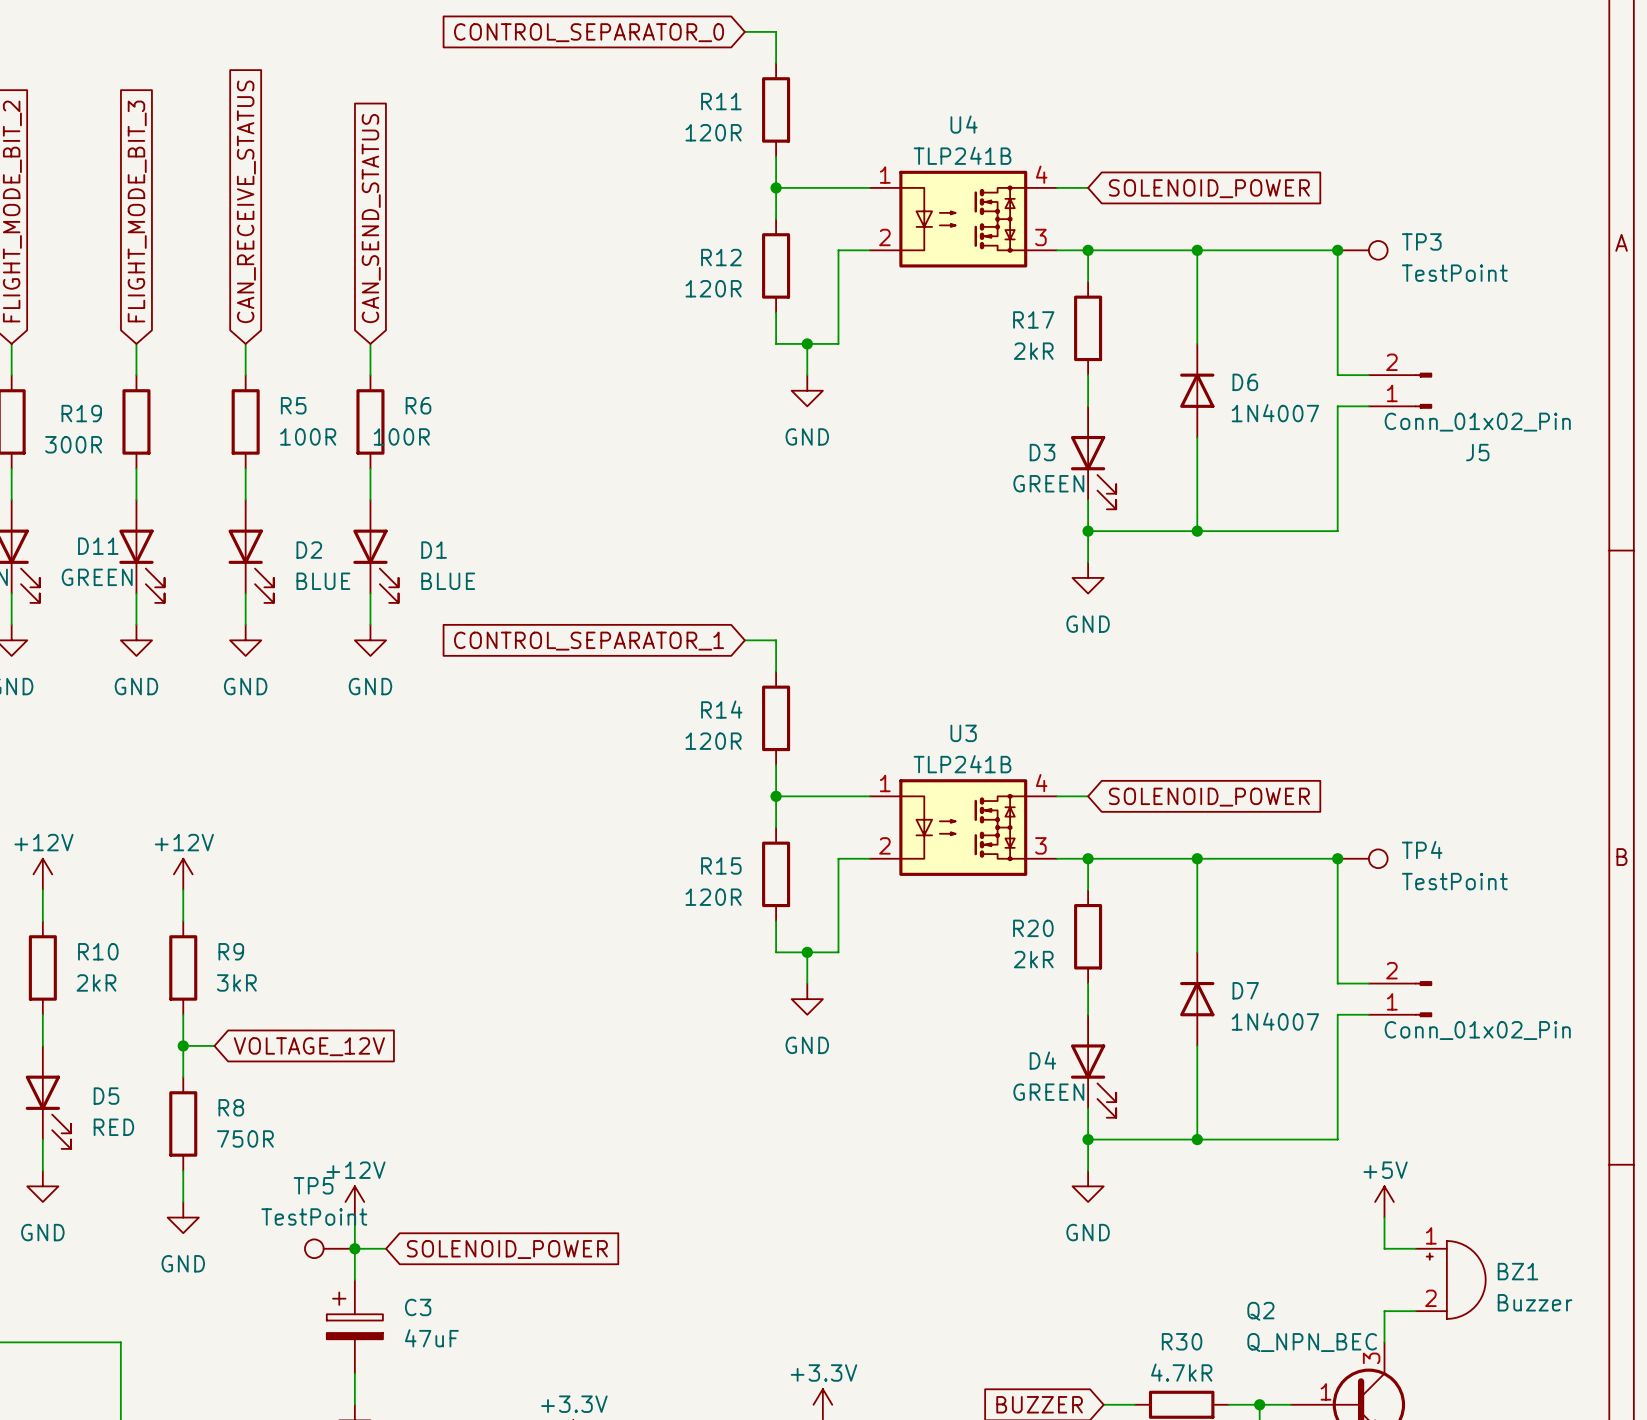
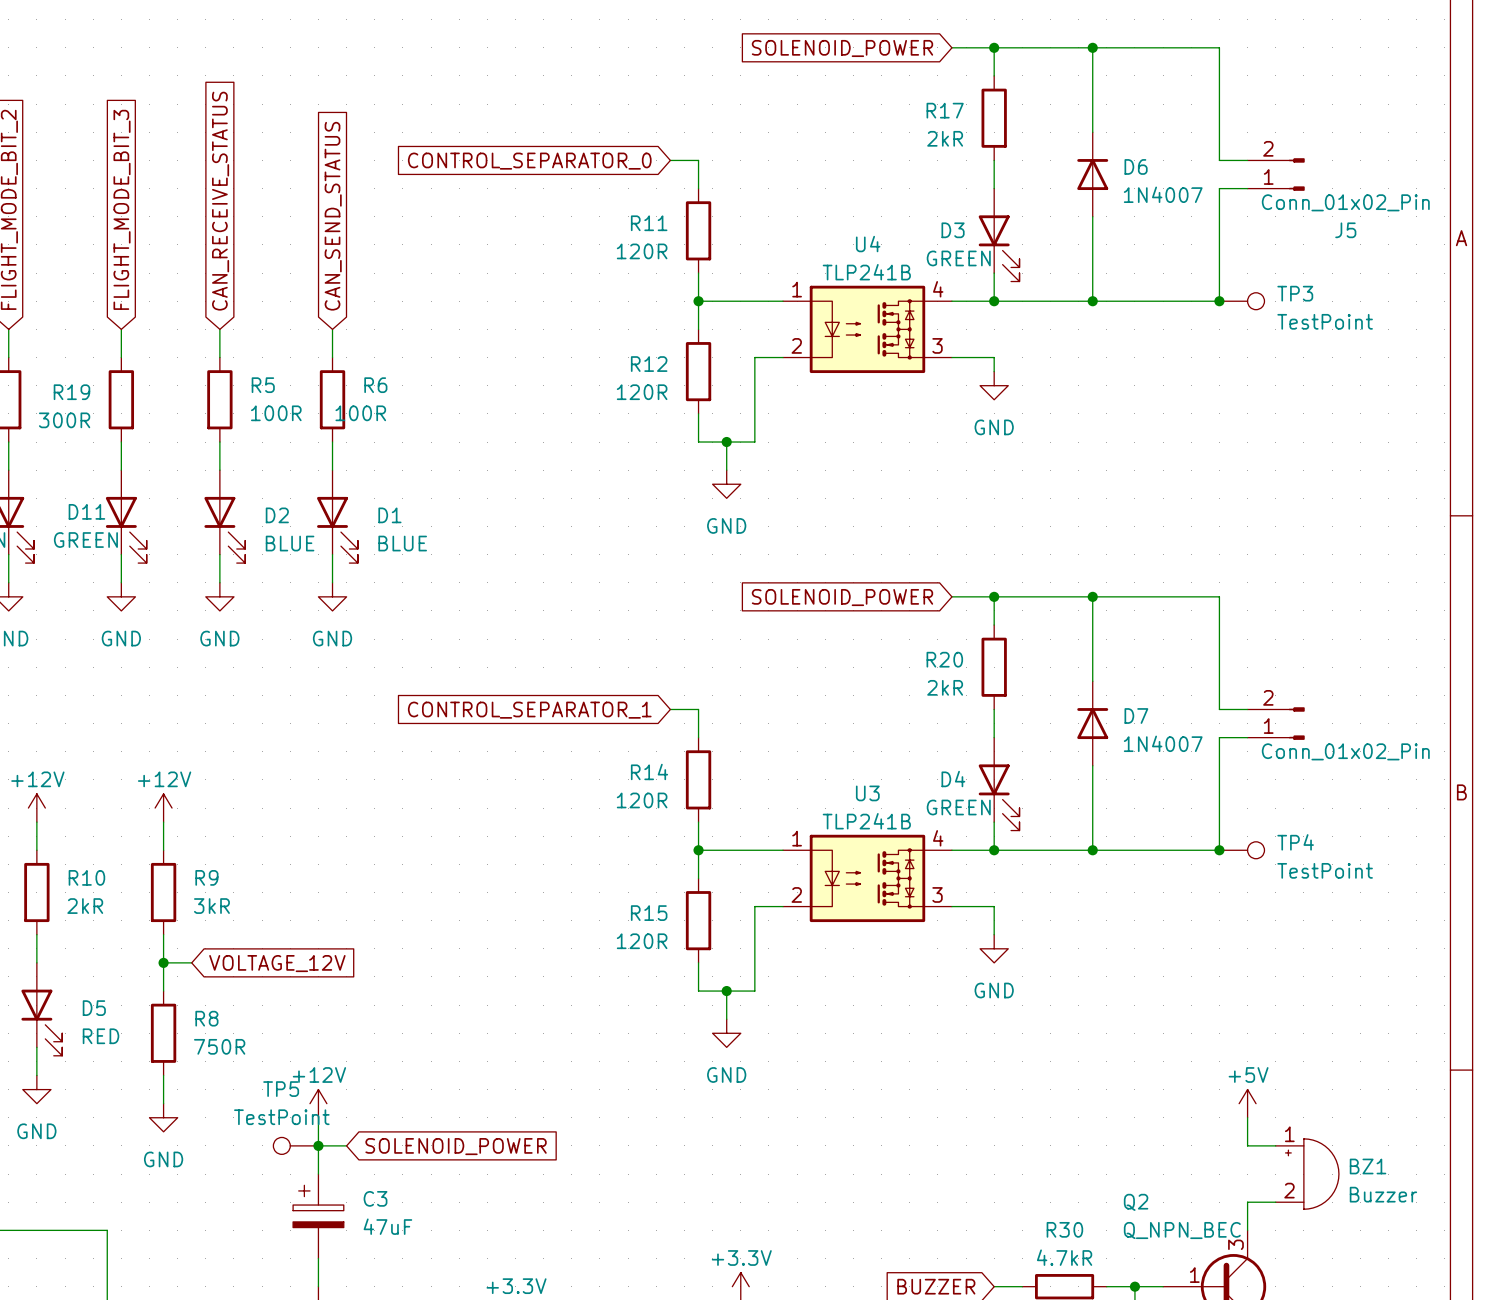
wire: (744, 31) (776, 31) (776, 63) -> none
wire: none -> (951, 47) (1219, 47) (1219, 160) (1247, 160)
junction: none -> (994, 47)
junction: none -> (1092, 47)
global label position: CONTROL_SEPARATOR_0 (589, 32) -> CONTROL_SEPARATOR_0 (529, 161)
R11 position: (776, 109) -> (698, 230)
wire: none -> (670, 160) (698, 160)
junction: (776, 187) -> none
wire: (869, 187) (776, 187) (776, 219) -> none
wire: (1056, 187) (1088, 187) -> none
wire: none -> (1247, 188) (1219, 188) (1219, 301) (951, 301)
global label rotation: 0° (1209, 188) -> 180° (842, 48)
global label position: SOLENOID_POWER (1209, 188) -> SOLENOID_POWER (842, 48)
U4 position: (963, 219) -> (867, 329)
wire: (869, 250) (838, 250) (838, 343) (776, 343) -> none
wire: (1056, 250) (1337, 250) (1337, 375) (1368, 375) -> none
wire: (1088, 250) (1088, 281) -> (994, 47) (994, 75)
junction: (1088, 250) -> none
wire: (1197, 250) (1197, 343) -> (1092, 47) (1092, 132)
junction: (1197, 250) -> none
junction position: (1337, 250) -> (1219, 301)
TP3 position: (1362, 250) -> (1241, 301)
R12 position: (776, 265) -> (698, 371)
wire: none -> (698, 273) (698, 301) (783, 301)
wire: none -> (994, 273) (994, 301)
junction: none -> (994, 301)
junction: none -> (1092, 301)
R17 position: (1088, 328) -> (994, 118)
wire: (807, 343) (807, 375) -> (726, 442) (726, 470)
junction position: (807, 343) -> (698, 301)
wire: none -> (783, 357) (754, 357) (754, 442) (698, 442) (698, 413)
wire: none -> (951, 357) (994, 357) (994, 371)
wire: (1088, 375) (1088, 406) -> (994, 160) (994, 188)
power symbol position: GND (807, 390) -> GND (726, 484)
D6 position: (1197, 390) -> (1092, 174)
J5 position: (1400, 390) -> (1276, 174)
power symbol: none -> GND (994, 385)
wire: (1368, 406) (1337, 406) (1337, 531) (1088, 531) -> none
wire: (1197, 437) (1197, 531) -> (1092, 216) (1092, 301)
D3 position: (1093, 457) -> (999, 235)
junction: none -> (726, 442)
wire: (1088, 499) (1088, 562) -> none
junction: (1088, 531) -> none
junction: (1197, 531) -> none
power symbol: GND (1088, 577) -> none
wire: (744, 640) (776, 640) (776, 671) -> none
wire: none -> (951, 596) (1219, 596) (1219, 709) (1247, 709)
junction: none -> (994, 596)
junction: none -> (1092, 596)
global label position: CONTROL_SEPARATOR_1 (589, 641) -> CONTROL_SEPARATOR_1 (529, 710)
R14 position: (776, 718) -> (698, 779)
wire: none -> (670, 709) (698, 709)
junction: (776, 796) -> none
wire: (869, 796) (776, 796) (776, 827) -> none
wire: (1056, 796) (1088, 796) -> none
wire: none -> (1247, 737) (1219, 737) (1219, 850) (951, 850)
global label rotation: 0° (1209, 797) -> 180° (842, 597)
global label position: SOLENOID_POWER (1209, 797) -> SOLENOID_POWER (842, 597)
U3 position: (963, 827) -> (867, 878)
wire: (869, 858) (838, 858) (838, 952) (776, 952) -> none
wire: (1056, 858) (1337, 858) (1337, 983) (1368, 983) -> none
wire: (1088, 858) (1088, 889) -> (994, 596) (994, 625)
junction: (1088, 858) -> none
wire: (1197, 858) (1197, 952) -> (1092, 596) (1092, 681)
junction: (1197, 858) -> none
junction position: (1337, 858) -> (1219, 850)
TP4 position: (1362, 858) -> (1241, 850)
R15 position: (776, 874) -> (698, 920)
wire: none -> (698, 822) (698, 850) (783, 850)
wire: none -> (994, 822) (994, 850)
junction: none -> (994, 850)
junction: none -> (1092, 850)
R20 position: (1088, 936) -> (994, 667)
wire: (807, 952) (807, 983) -> (726, 991) (726, 1019)
junction position: (807, 952) -> (698, 850)
wire: none -> (783, 906) (754, 906) (754, 991) (698, 991) (698, 962)
wire: none -> (951, 906) (994, 906) (994, 934)
wire: (1088, 983) (1088, 1014) -> (994, 709) (994, 737)
power symbol position: GND (807, 999) -> GND (726, 1033)
D7 position: (1197, 999) -> (1092, 723)
part position: (1400, 999) -> (1276, 723)
wire: (1368, 1014) (1337, 1014) (1337, 1139) (1088, 1139) -> none
power symbol: none -> GND (994, 948)
wire: (1197, 1045) (1197, 1139) -> (1092, 765) (1092, 850)
D4 position: (1093, 1066) -> (999, 784)
junction: none -> (726, 991)
wire: (1088, 1108) (1088, 1170) -> none
junction: (1088, 1139) -> none
junction: (1197, 1139) -> none
power symbol: GND (1088, 1186) -> none

